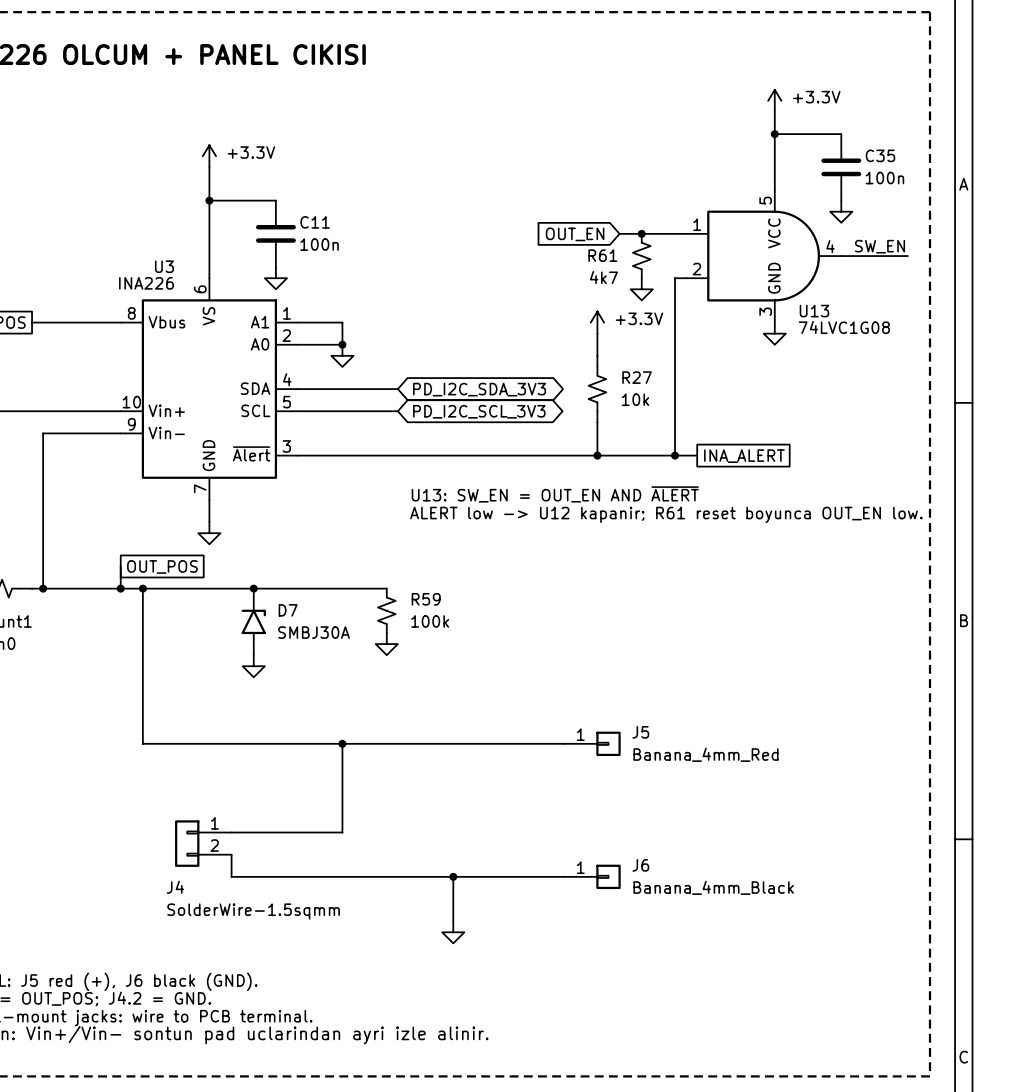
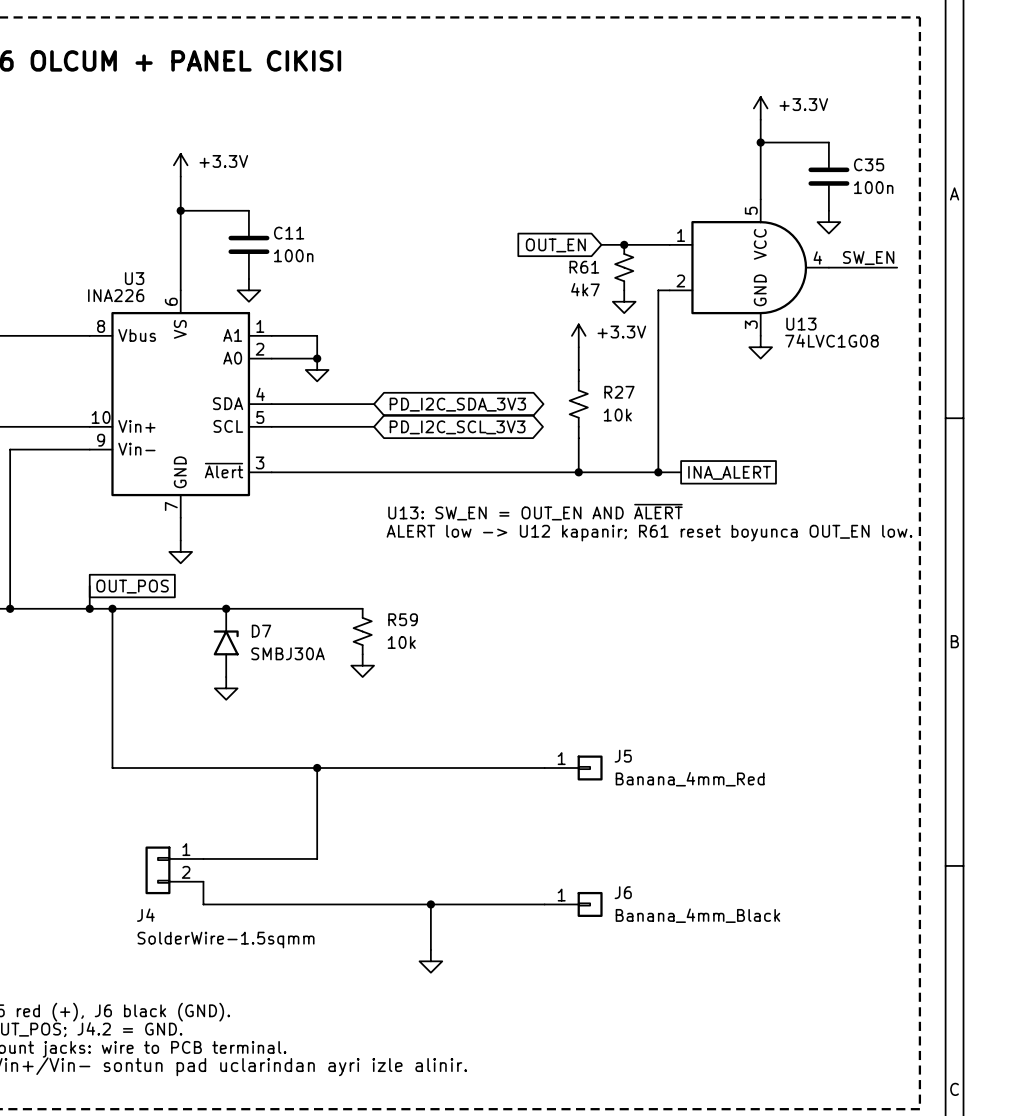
R59 value: 100k (430, 621) -> 10k (401, 642)

